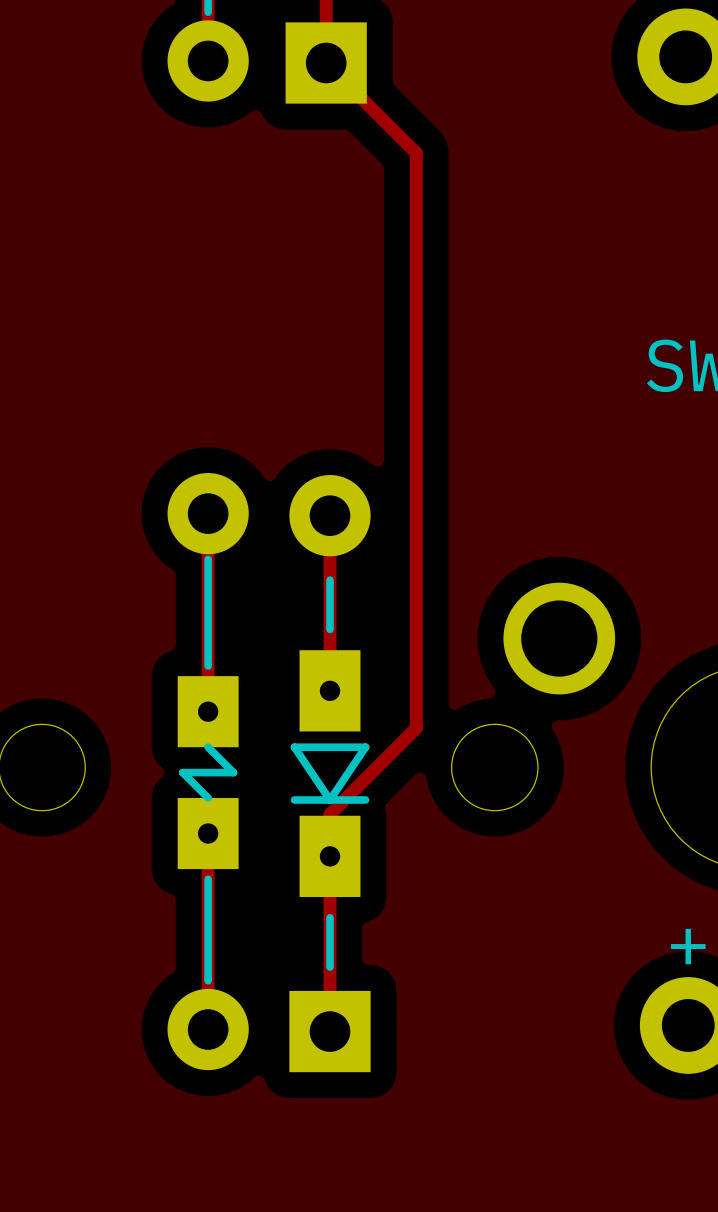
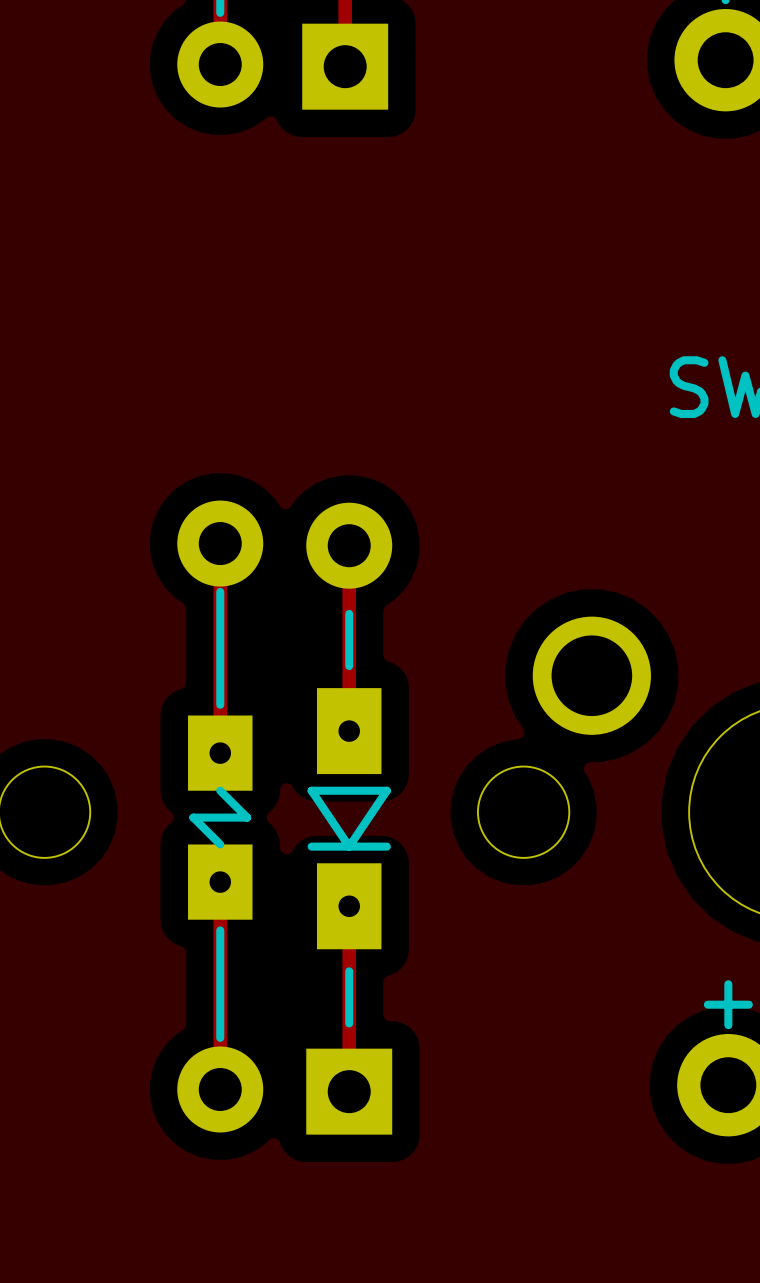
track: (326, 62) (416, 153) (416, 728) (330, 814) (330, 856) -> none

